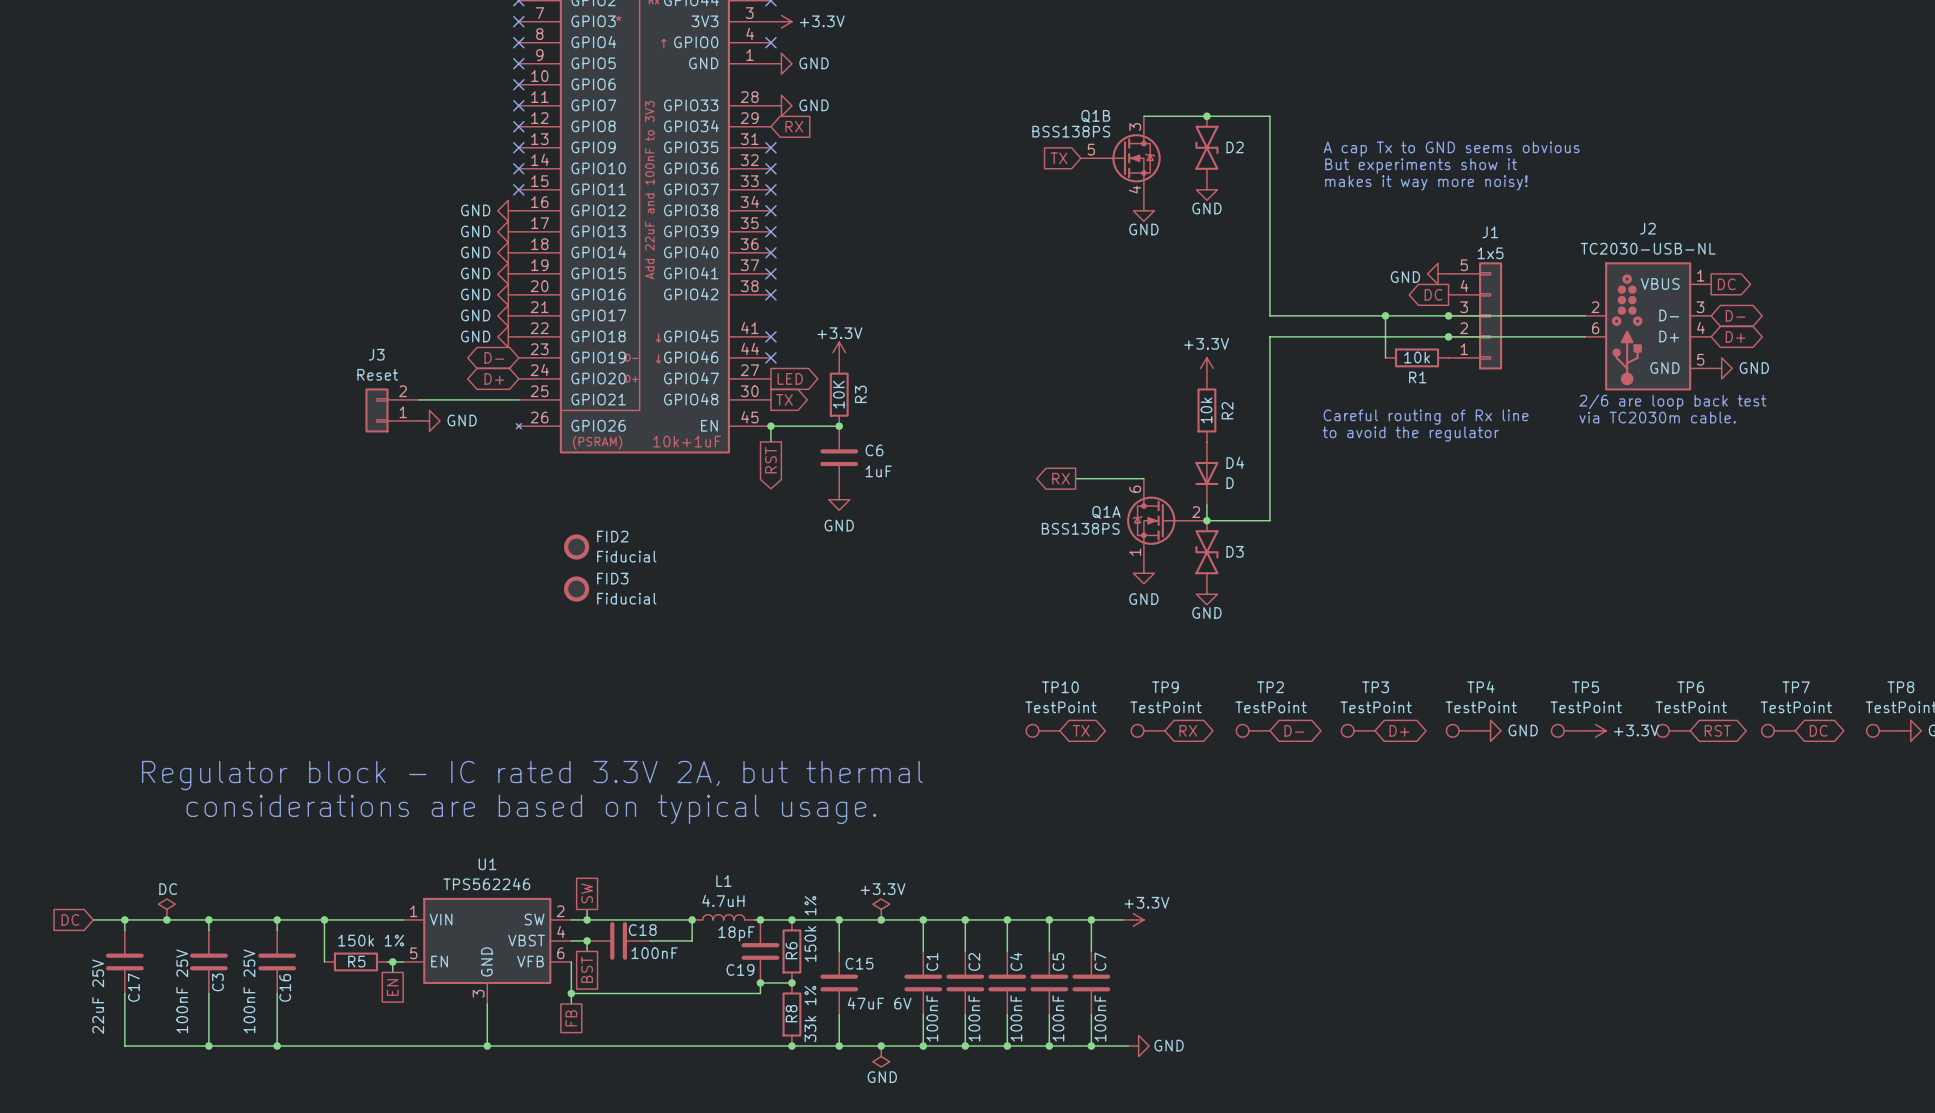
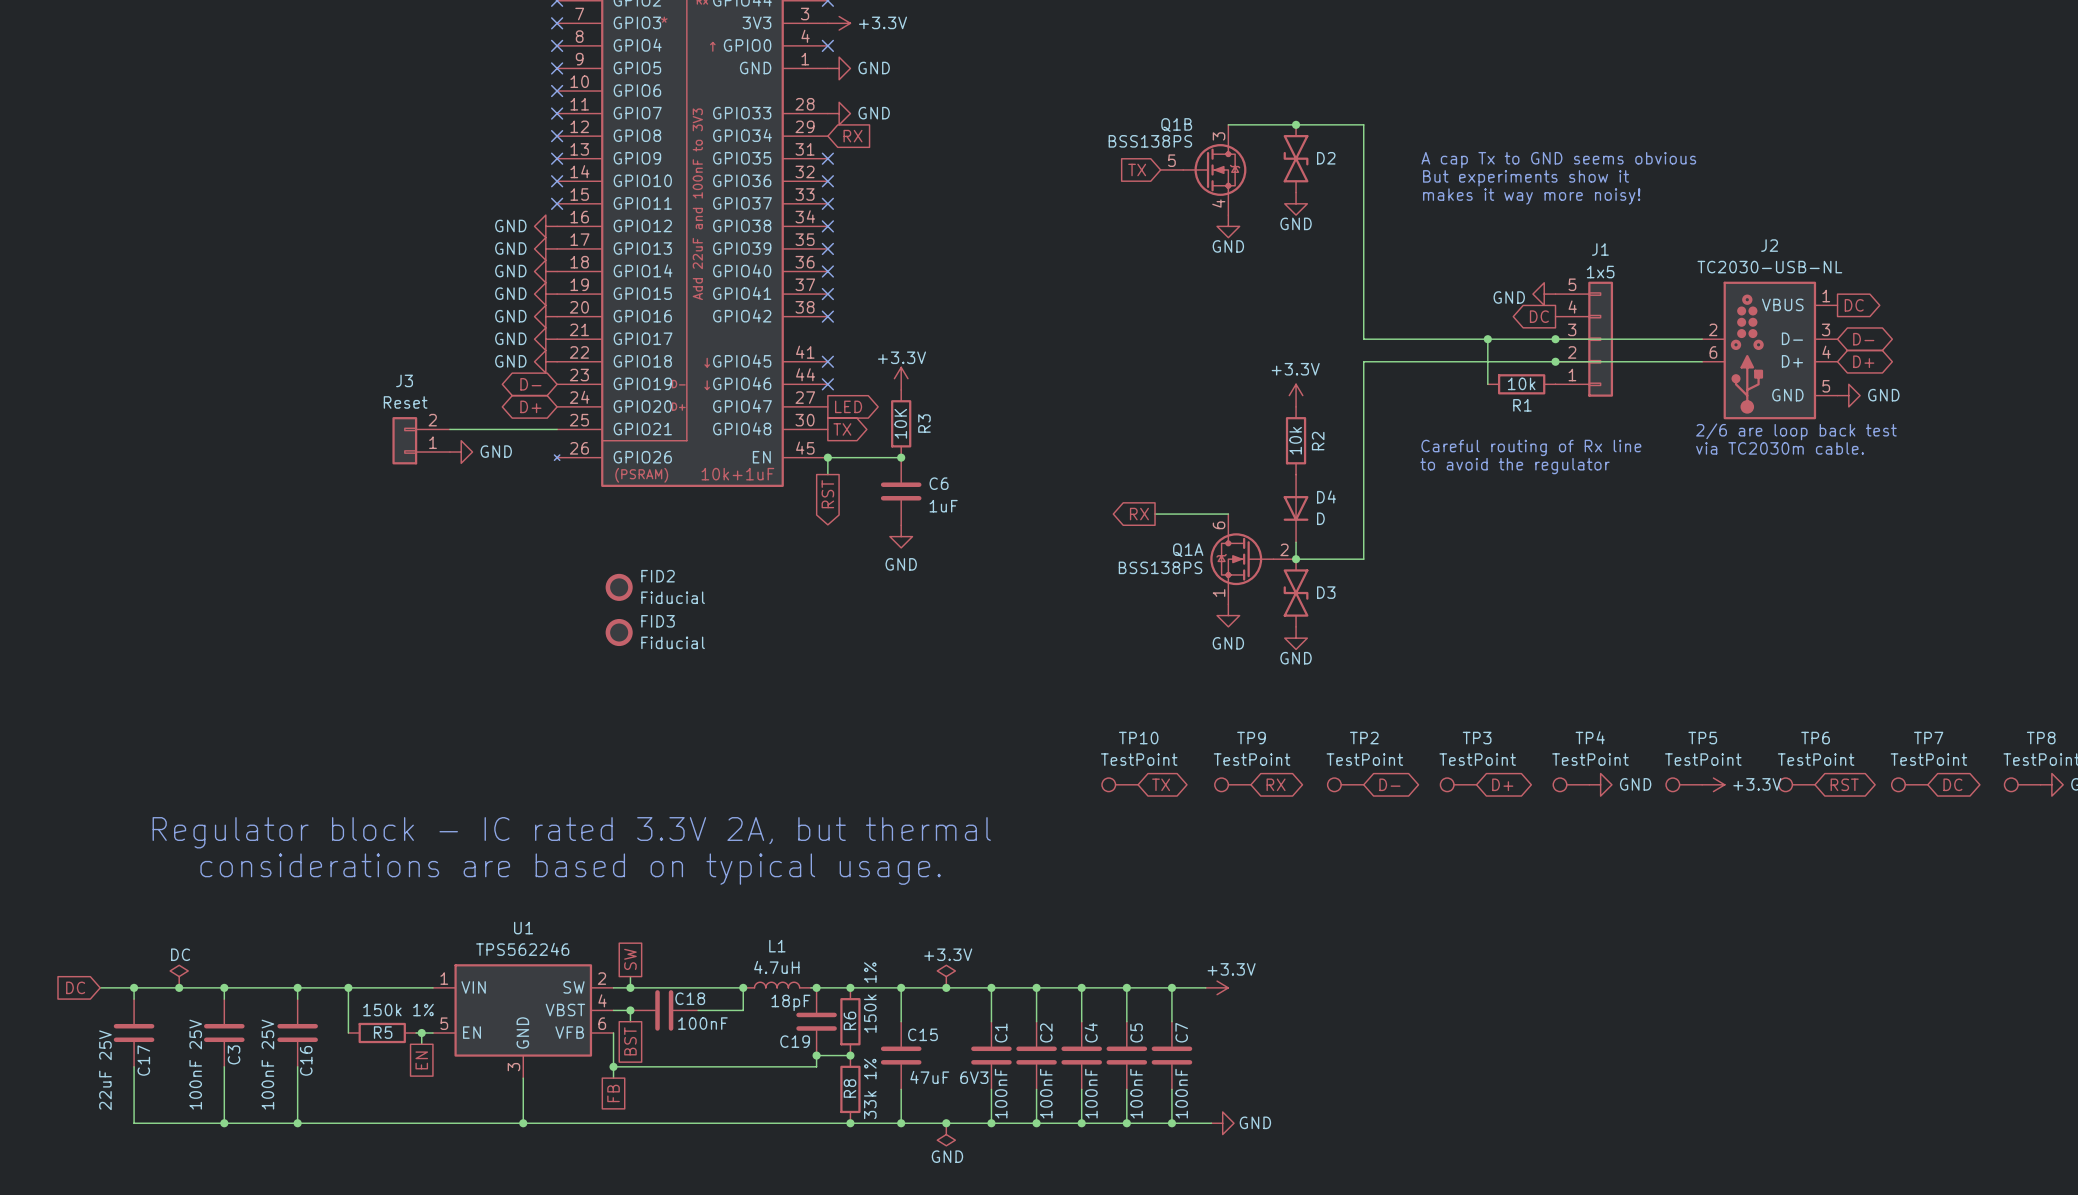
C15 value: 47uF 6V (879, 1003) -> 47uF 6V3 (949, 1077)

